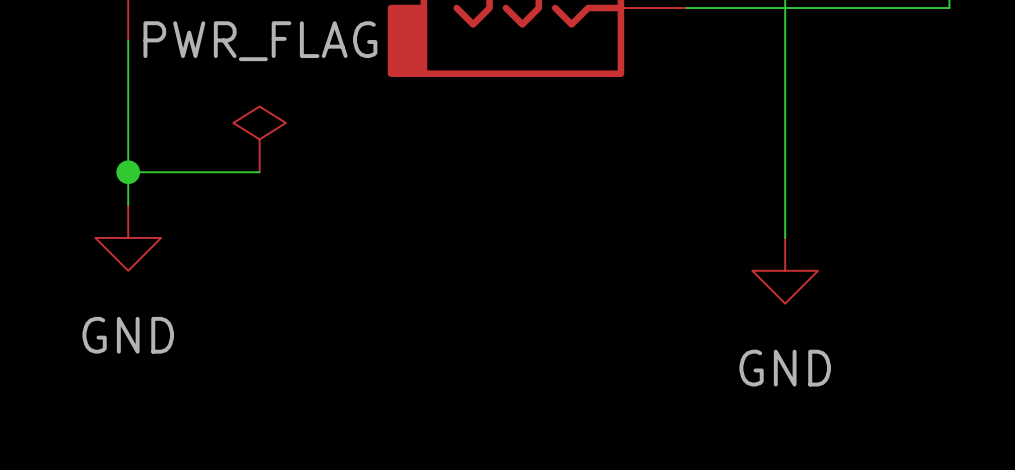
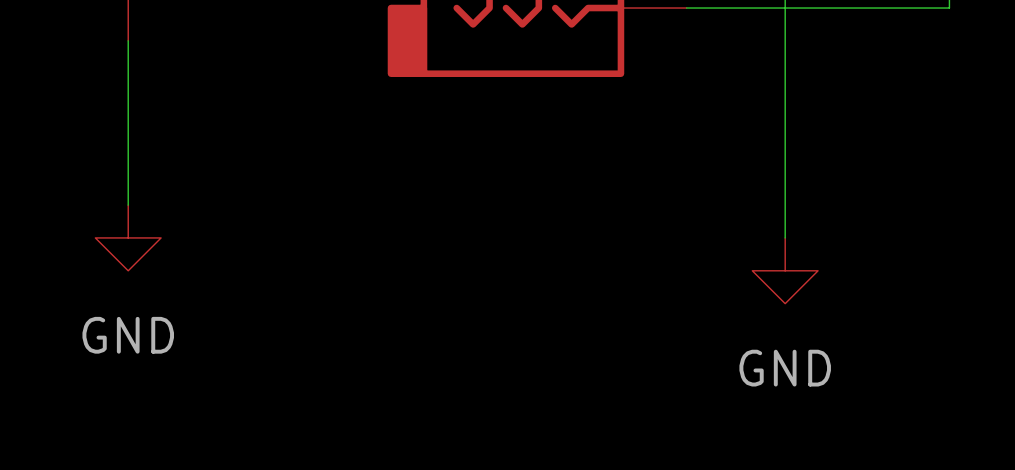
power symbol: PWR_FLAG (259, 139) -> none
wire: (128, 172) (259, 172) -> none
junction: (128, 172) -> none

